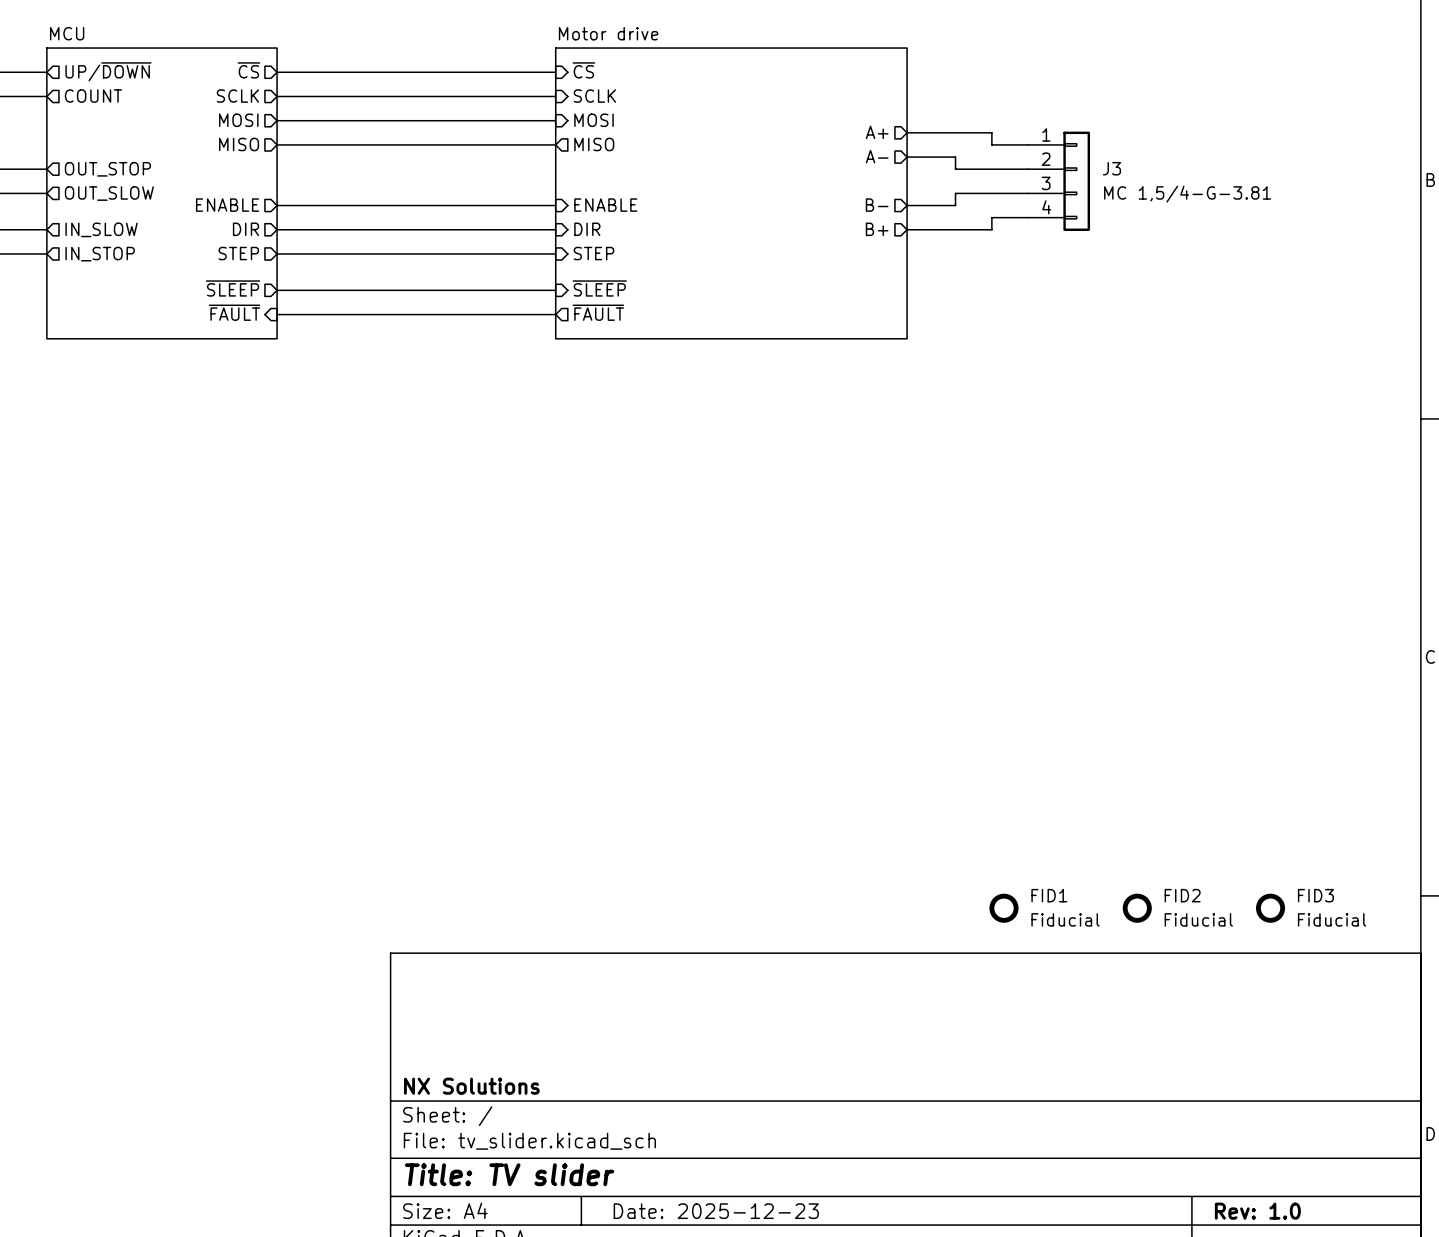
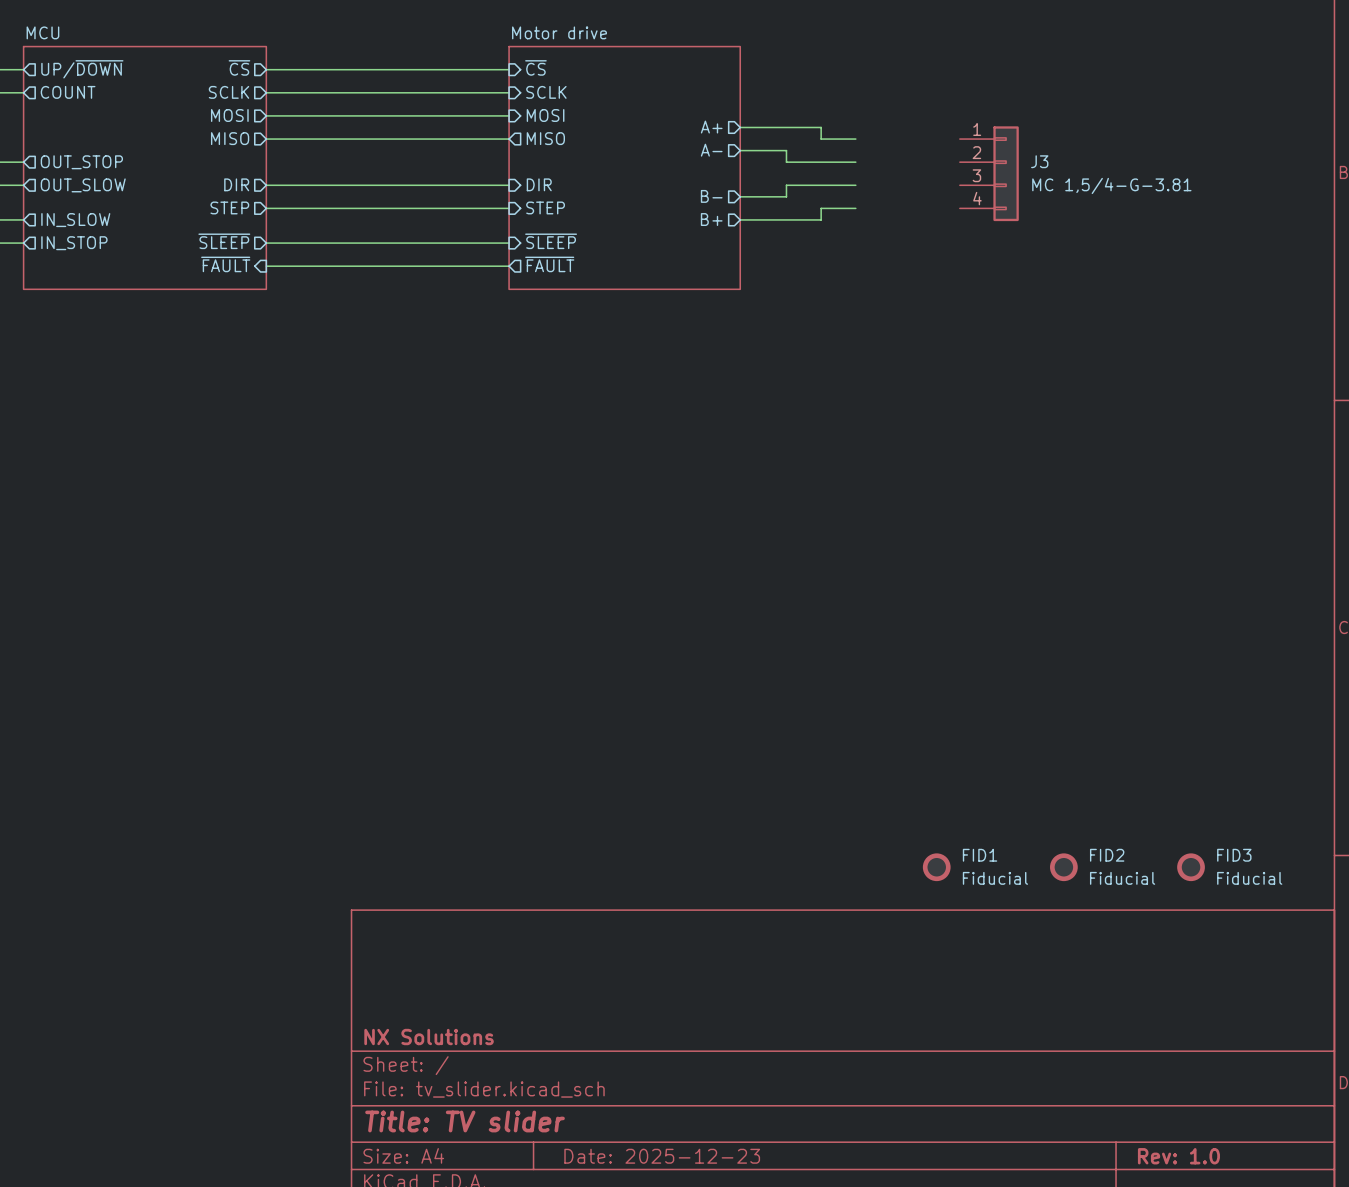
sheet pin position: ~{CS} (248, 70) -> ~{CS} (239, 67)
wire: (277, 72) (301, 72) -> none
sheet pin position: SCLK (237, 96) -> SCLK (229, 92)
wire: (277, 96) (301, 96) -> none
sheet pin position: MOSI (238, 120) -> MOSI (229, 115)
wire: (277, 120) (301, 120) -> none
sheet pin position: A+ (877, 132) -> A+ (711, 127)
wire: (907, 132) (991, 132) (991, 144) (1028, 144) -> (740, 127) (821, 127) (821, 139) (855, 139)
sheet pin position: MISO (239, 144) -> MISO (230, 138)
wire: (277, 144) (301, 144) -> none
sheet pin position: A- (877, 156) -> A- (711, 150)
wire: (907, 157) (955, 157) (955, 169) (1028, 169) -> (740, 150) (786, 150) (786, 162) (855, 162)
sheet MCU: none -> (144, 167)
sheet Motor drive: none -> (624, 167)
sheet MCU: (161, 193) -> none
wire: none -> (266, 185) (509, 185)
sheet Motor drive: (731, 193) -> none
wire: (1028, 193) (955, 193) (955, 205) (907, 205) -> (855, 185) (786, 185) (786, 196) (740, 196)
sheet pin: ENABLE (227, 205) -> none
wire: (277, 205) (555, 205) -> none
sheet pin: ENABLE (605, 205) -> none
sheet pin position: B- (877, 205) -> B- (711, 196)
wire: none -> (266, 208) (509, 208)
sheet pin: none -> STEP (545, 207)
wire: (1028, 217) (991, 217) (991, 229) (907, 229) -> (855, 208) (821, 208) (821, 219) (740, 219)
sheet pin position: DIR (246, 229) -> DIR (236, 184)
wire: (277, 229) (555, 229) -> none
sheet pin position: DIR (587, 229) -> DIR (539, 184)
sheet pin position: B+ (877, 229) -> B+ (711, 219)
sheet pin position: STEP (238, 253) -> STEP (229, 207)
wire: (277, 253) (301, 253) -> none
sheet pin: STEP (593, 253) -> ~{SLEEP} (551, 241)
wire: none -> (266, 266) (509, 266)
sheet pin position: ~{SLEEP} (233, 288) -> ~{SLEEP} (224, 241)
sheet pin: ~{SLEEP} (599, 288) -> none
wire: (277, 290) (555, 290) -> none
sheet pin position: ~{FAULT} (234, 312) -> ~{FAULT} (225, 264)
sheet pin position: ~{FAULT} (598, 312) -> ~{FAULT} (549, 264)
wire: (277, 314) (555, 314) -> none

